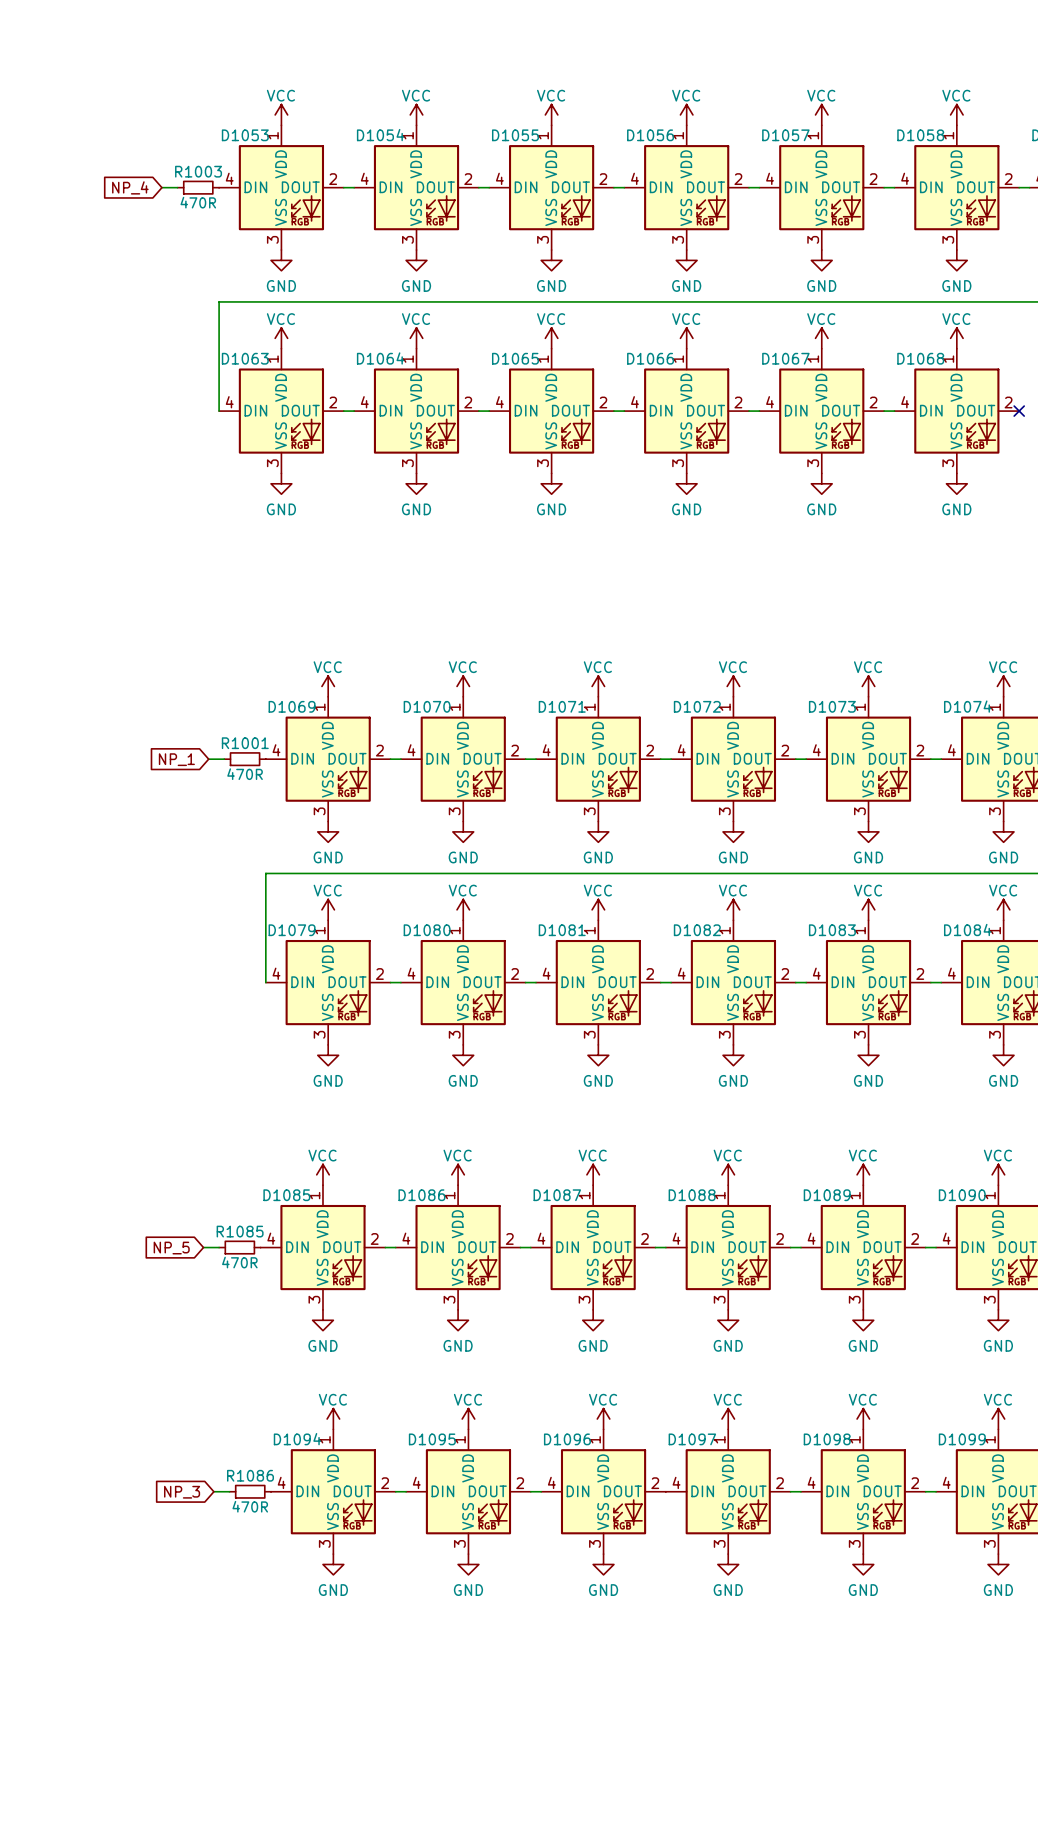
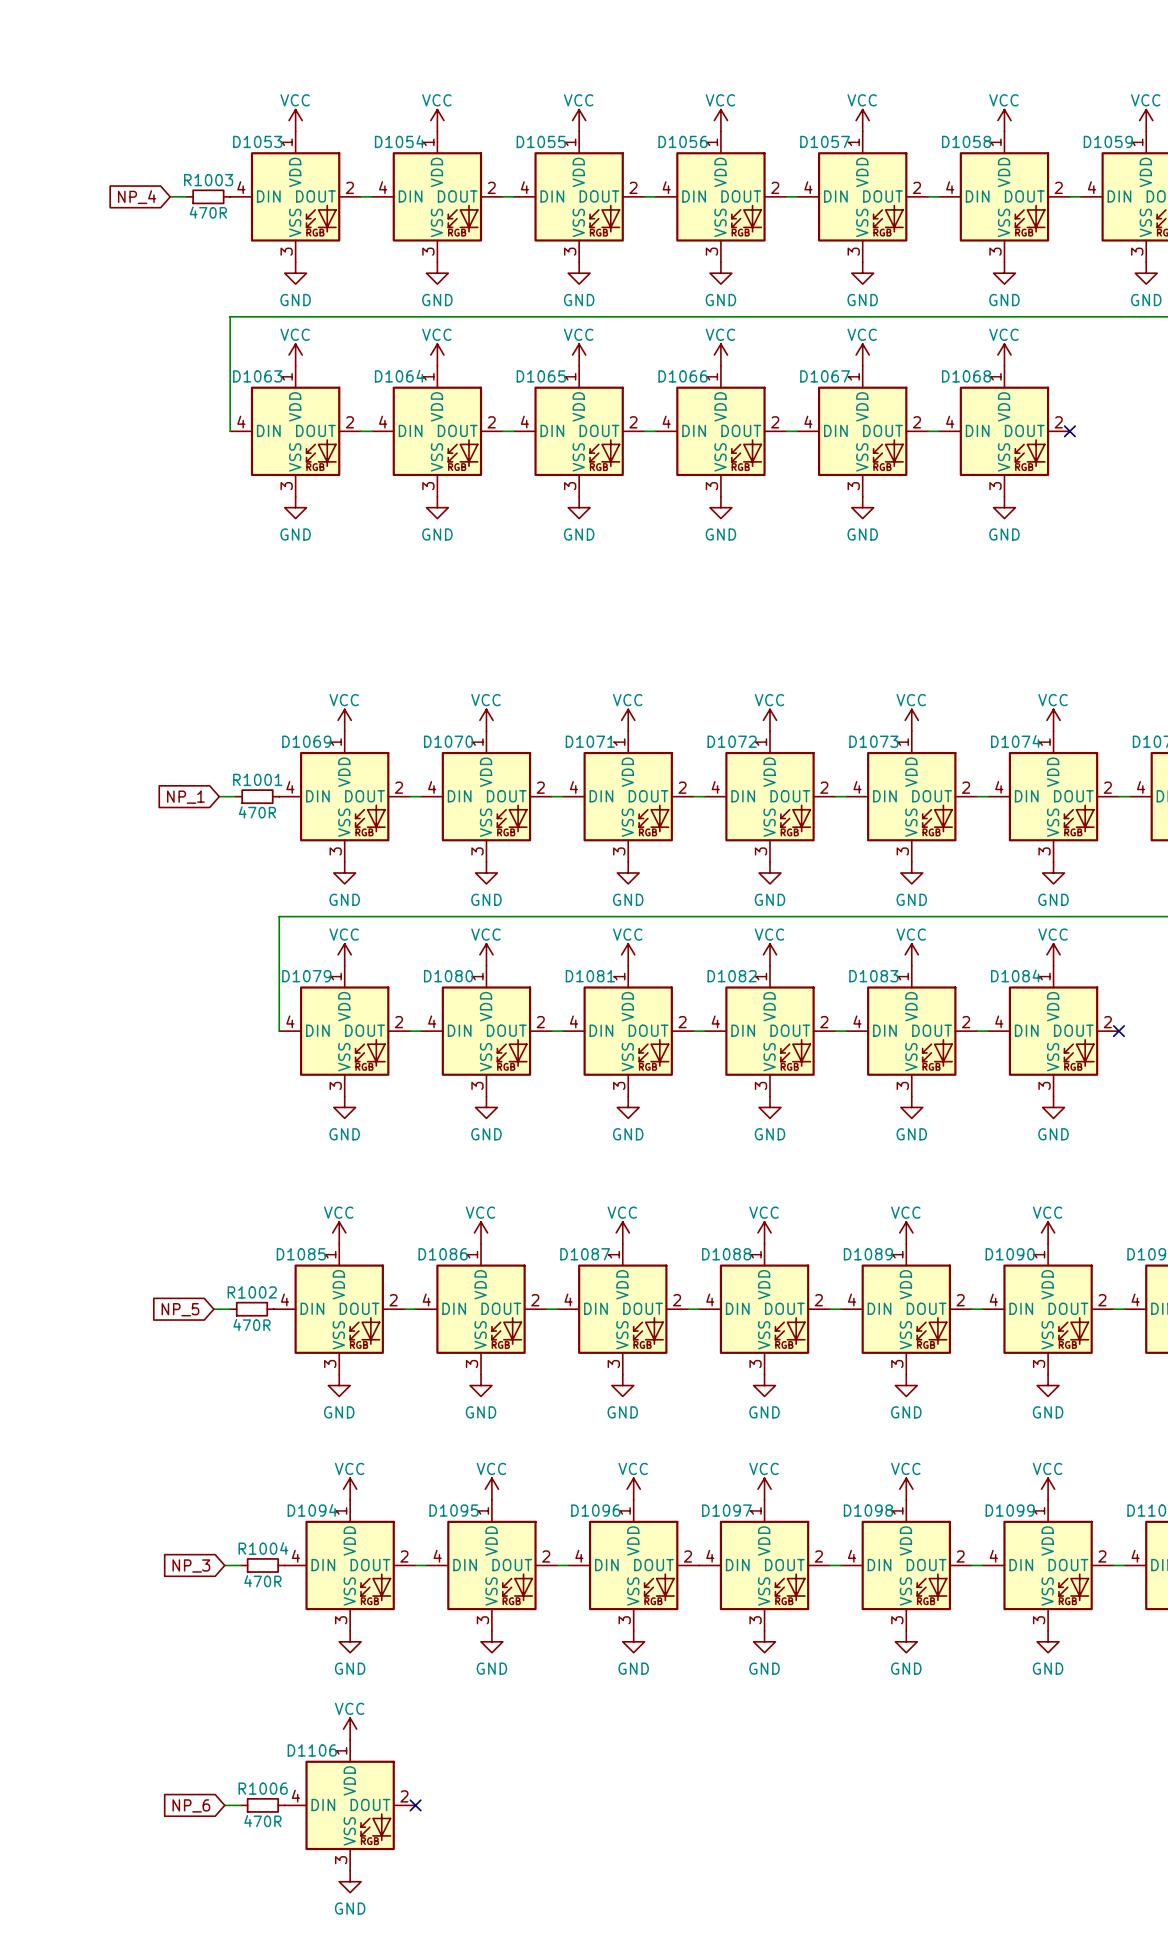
R1085 name: R1085 (240, 1231) -> R1002 (252, 1292)
R1086 name: R1086 (250, 1475) -> R1004 (263, 1548)
power symbol: none -> VCC (350, 1729)
global label: none -> NP_6 (191, 1805)
wire: none -> (224, 1805) (241, 1805)
R1006: none -> 470R (262, 1805)
D1106: none -> (350, 1805)
no-connect mark: none -> (415, 1805)
power symbol: none -> GND (350, 1881)

